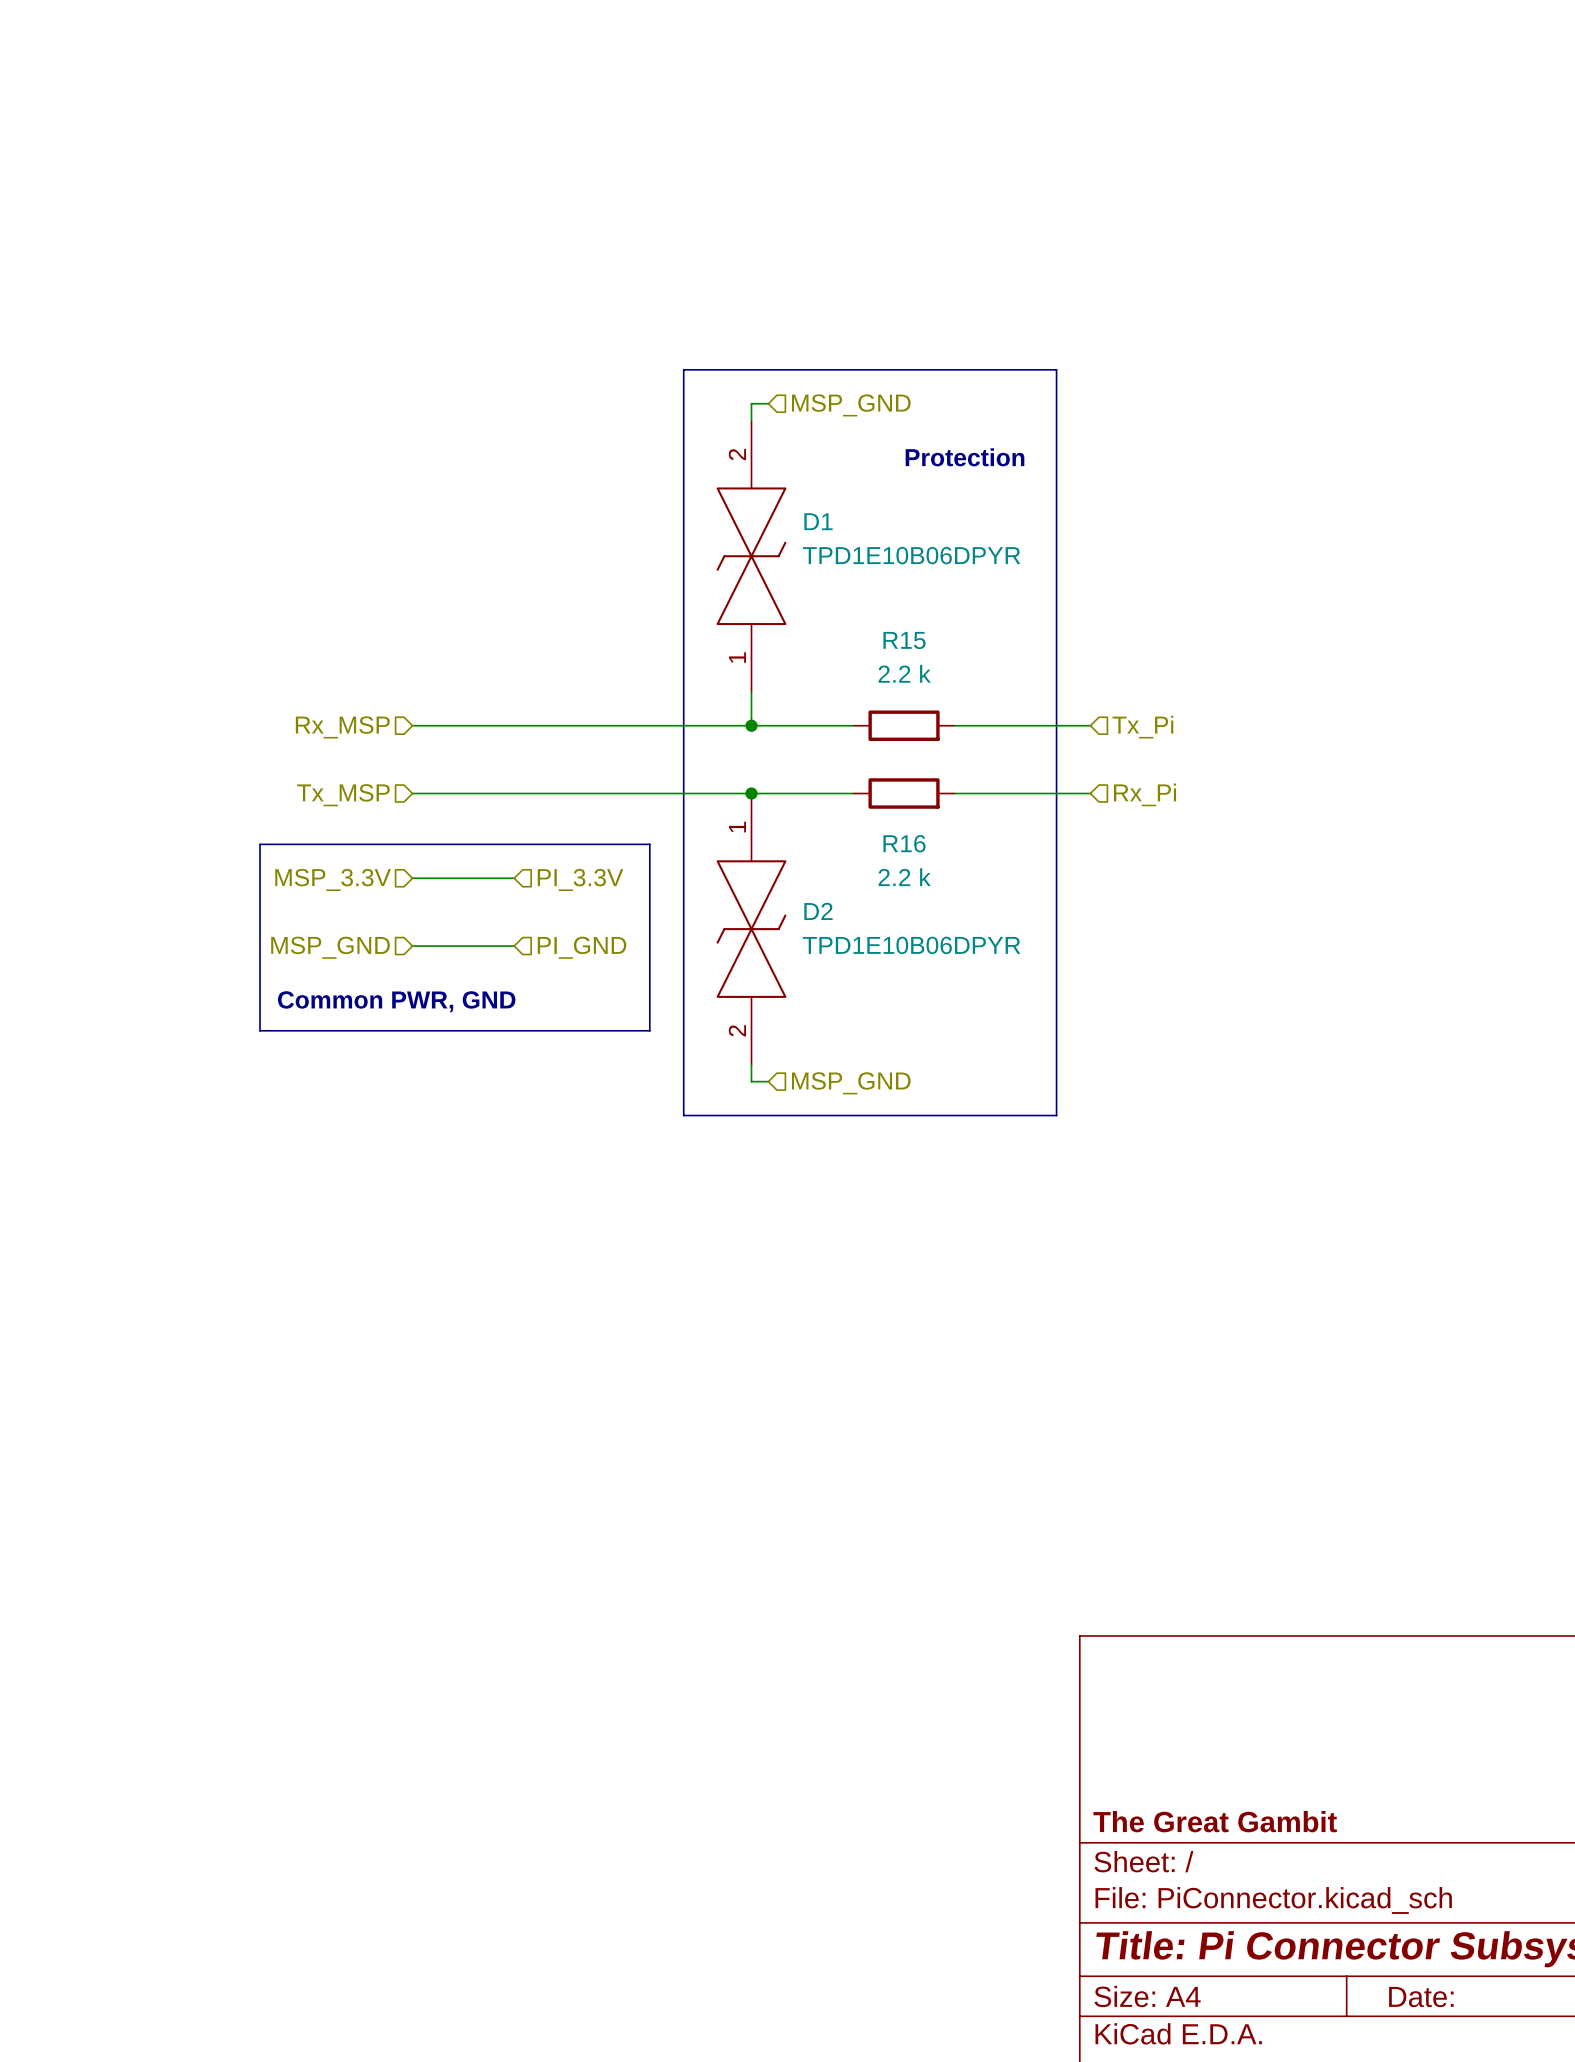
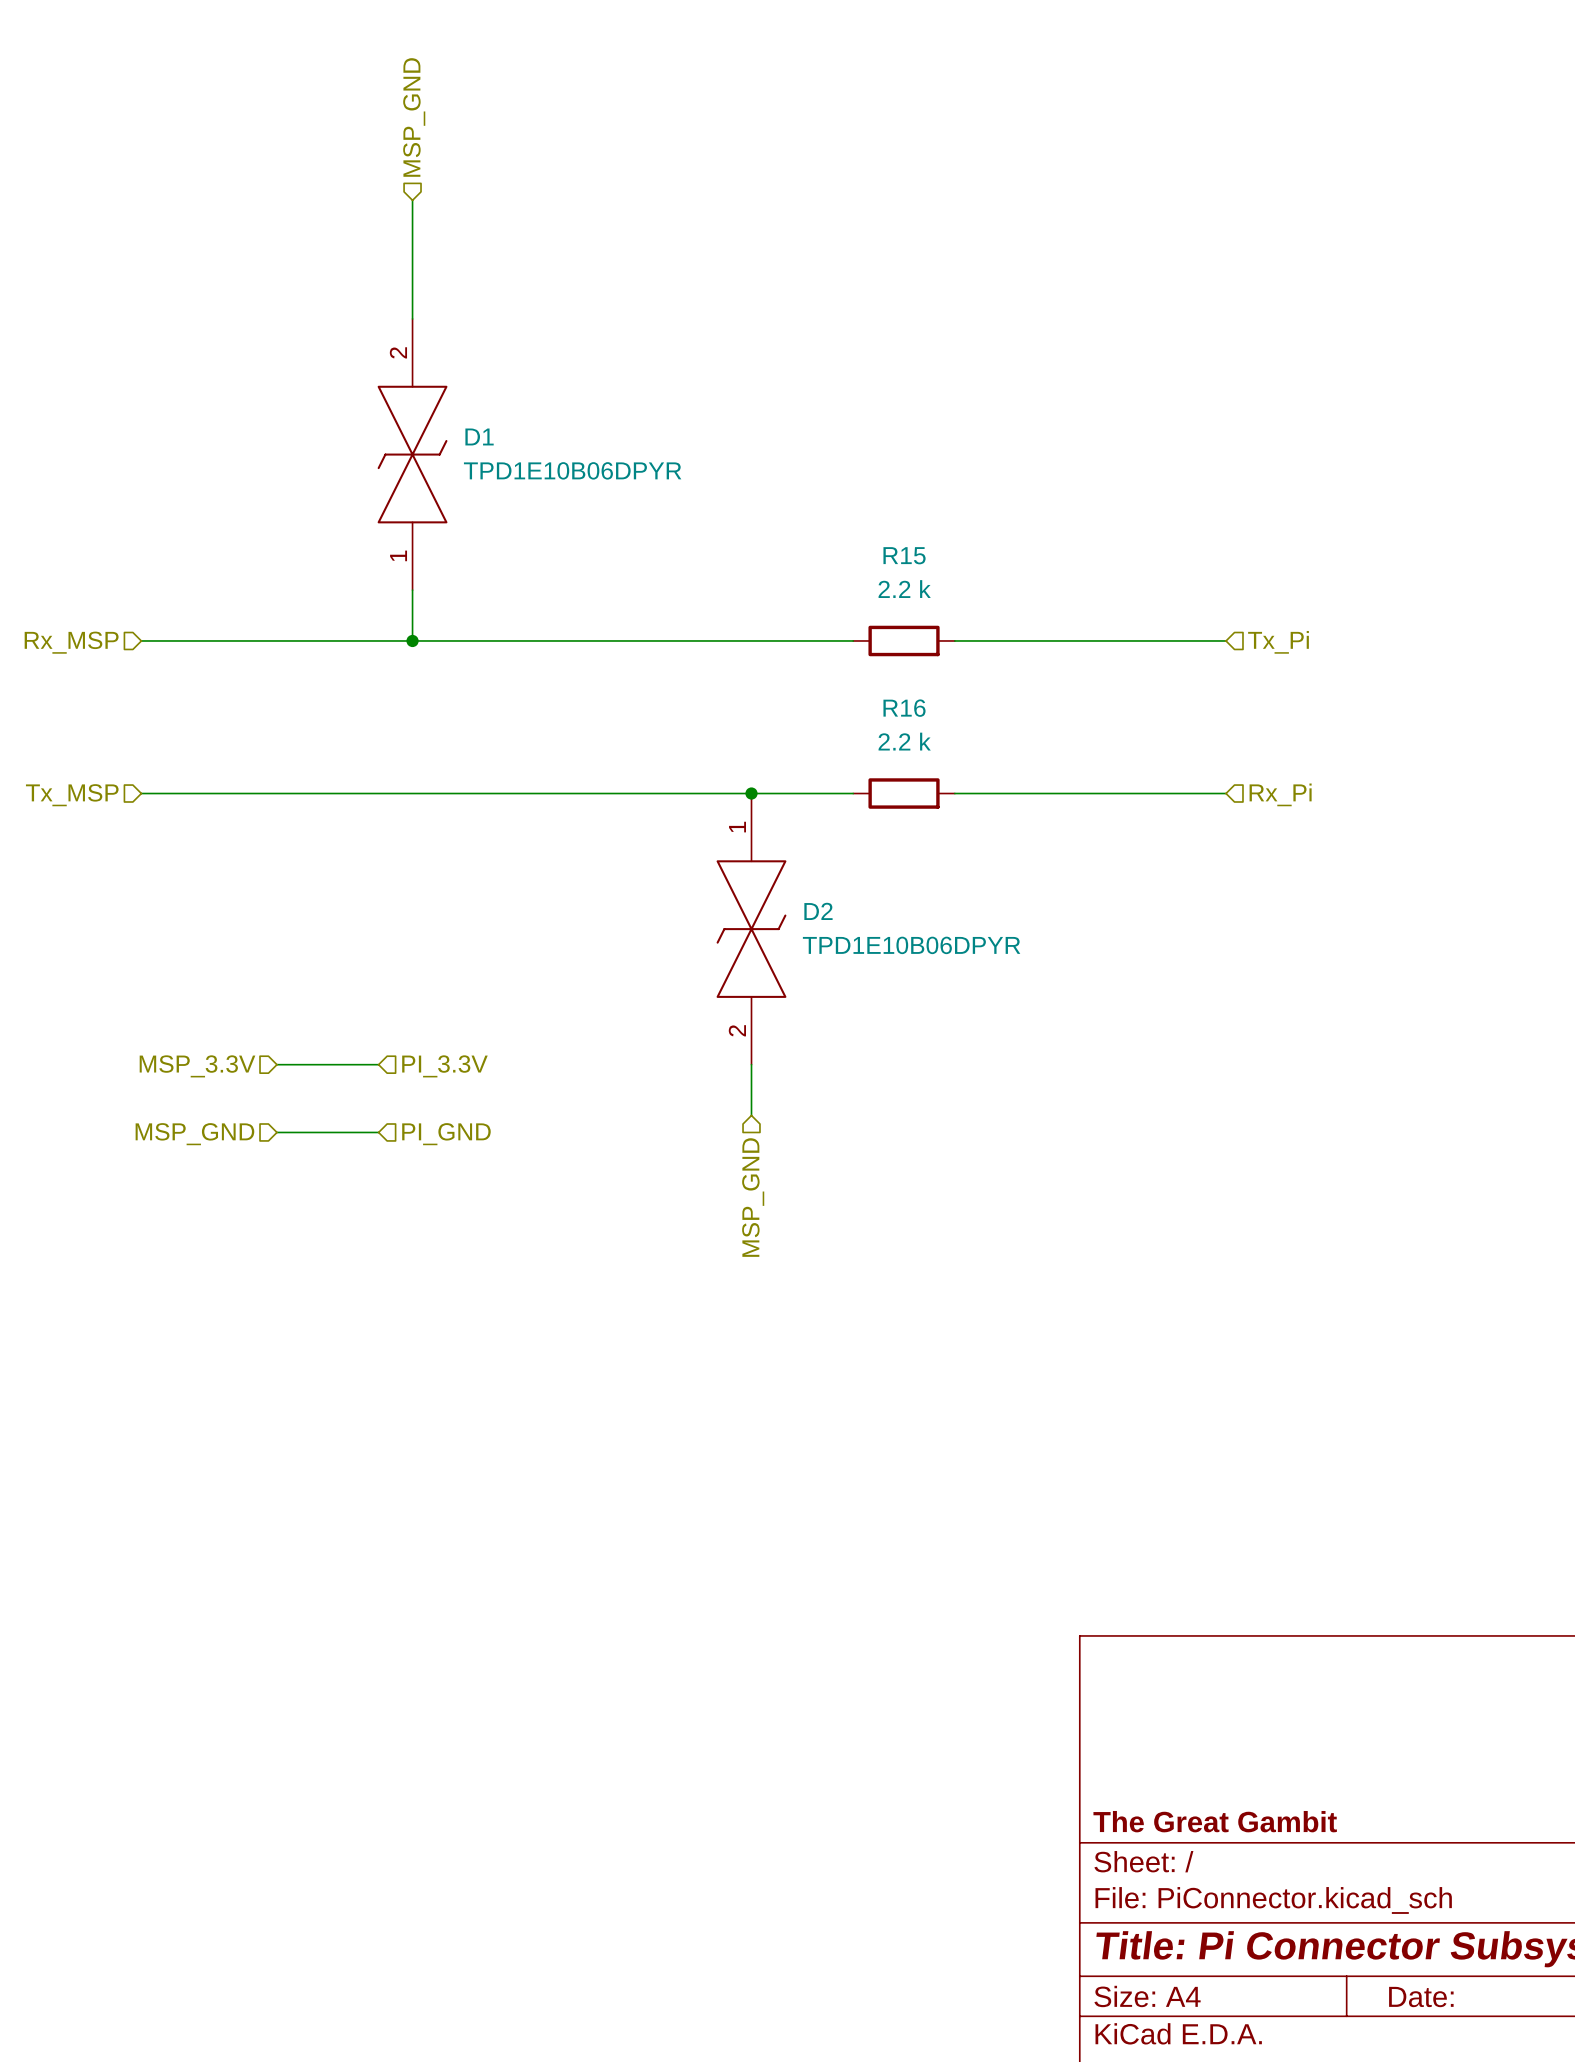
hierarchical label: none -> MSP_GND (414, 117)
wire: none -> (412, 200) (412, 318)
line: (683, 369) (1056, 369) (1056, 1115) (683, 1115) (683, 369) -> none
wire: (768, 403) (751, 403) (751, 420) -> none
hierarchical label: MSP_GND (851, 405) -> none
text: Protection (965, 457) -> none
D1 name position: D1 (818, 521) -> D1 (479, 436)
D1 value position: TPD1E10B06DPYR (911, 555) -> TPD1E10B06DPYR (572, 470)
D1 position: (751, 556) -> (412, 454)
wire: none -> (412, 590) (412, 640)
wire: none -> (141, 640) (853, 640)
junction: none -> (412, 640)
wire: none -> (954, 640) (1226, 640)
wire: (751, 691) (751, 725) -> none
wire: (412, 725) (853, 725) -> none
junction: (751, 725) -> none
R15 position: (904, 725) -> (904, 640)
wire: (954, 725) (1090, 725) -> (1090, 793) (1226, 793)
hierarchical label position: Rx_MSP (342, 727) -> Rx_MSP (71, 642)
hierarchical label position: Tx_Pi (1142, 727) -> Tx_Pi (1278, 642)
wire: none -> (141, 793) (412, 793)
hierarchical label position: Rx_Pi (1145, 794) -> Rx_Pi (1280, 794)
hierarchical label position: Tx_MSP (343, 795) -> Tx_MSP (72, 795)
R16 name position: R16 (904, 843) -> R16 (904, 708)
line: (260, 844) (649, 844) (649, 1030) (260, 1030) (260, 844) -> none
R16 value position: 2.2 k (904, 877) -> 2.2 k (904, 741)
wire: (412, 878) (514, 878) -> (276, 1064) (378, 1064)
hierarchical label position: MSP_3.3V (333, 879) -> MSP_3.3V (197, 1066)
hierarchical label position: PI_3.3V (580, 879) -> PI_3.3V (444, 1066)
wire: (412, 946) (514, 946) -> (276, 1132) (378, 1132)
hierarchical label: MSP_GND (330, 947) -> none
hierarchical label position: PI_GND (582, 947) -> PI_GND (446, 1134)
text: Common PWR, GND (396, 1001) -> none
wire: (751, 1081) (768, 1081) -> (751, 1081) (751, 1115)
hierarchical label rotation: 0° (851, 1083) -> 90° clockwise (753, 1197)
hierarchical label position: MSP_GND (851, 1083) -> MSP_GND (753, 1197)
hierarchical label: none -> MSP_GND (194, 1134)

